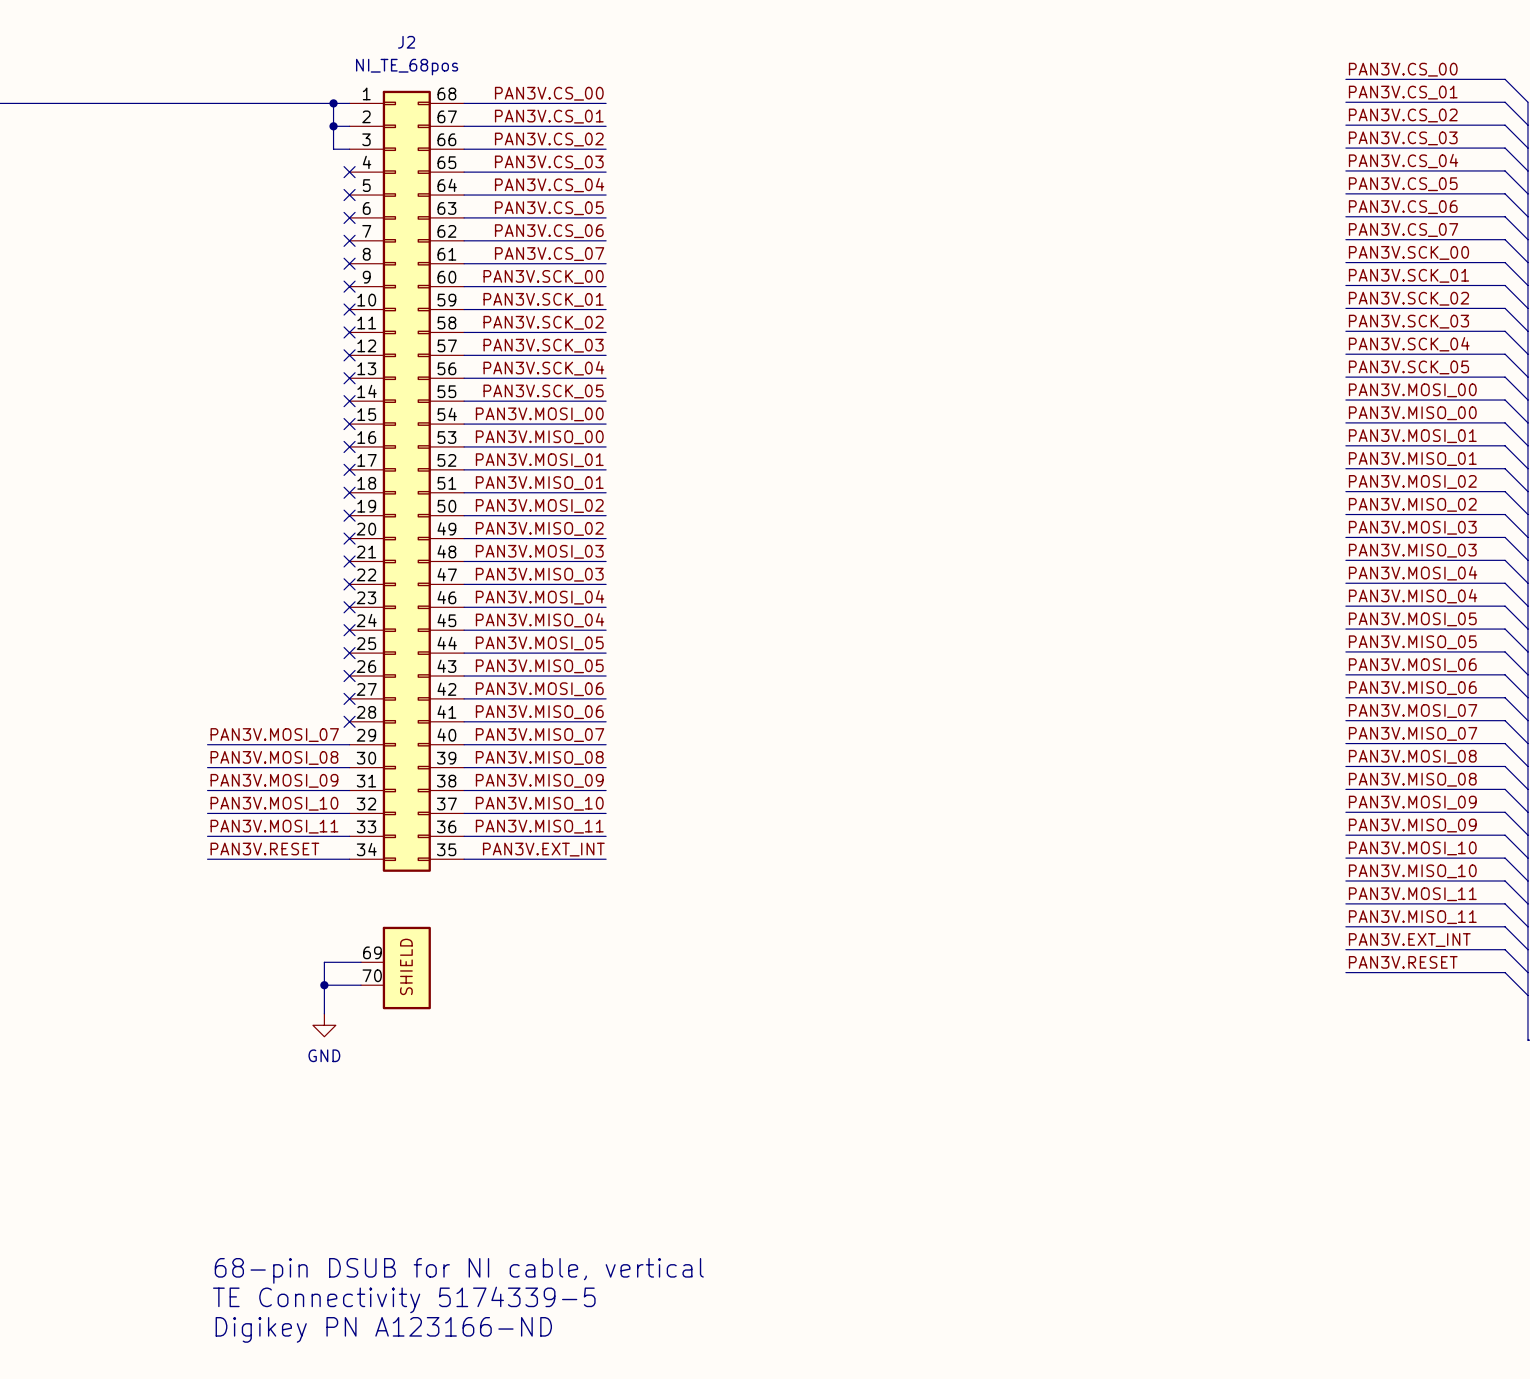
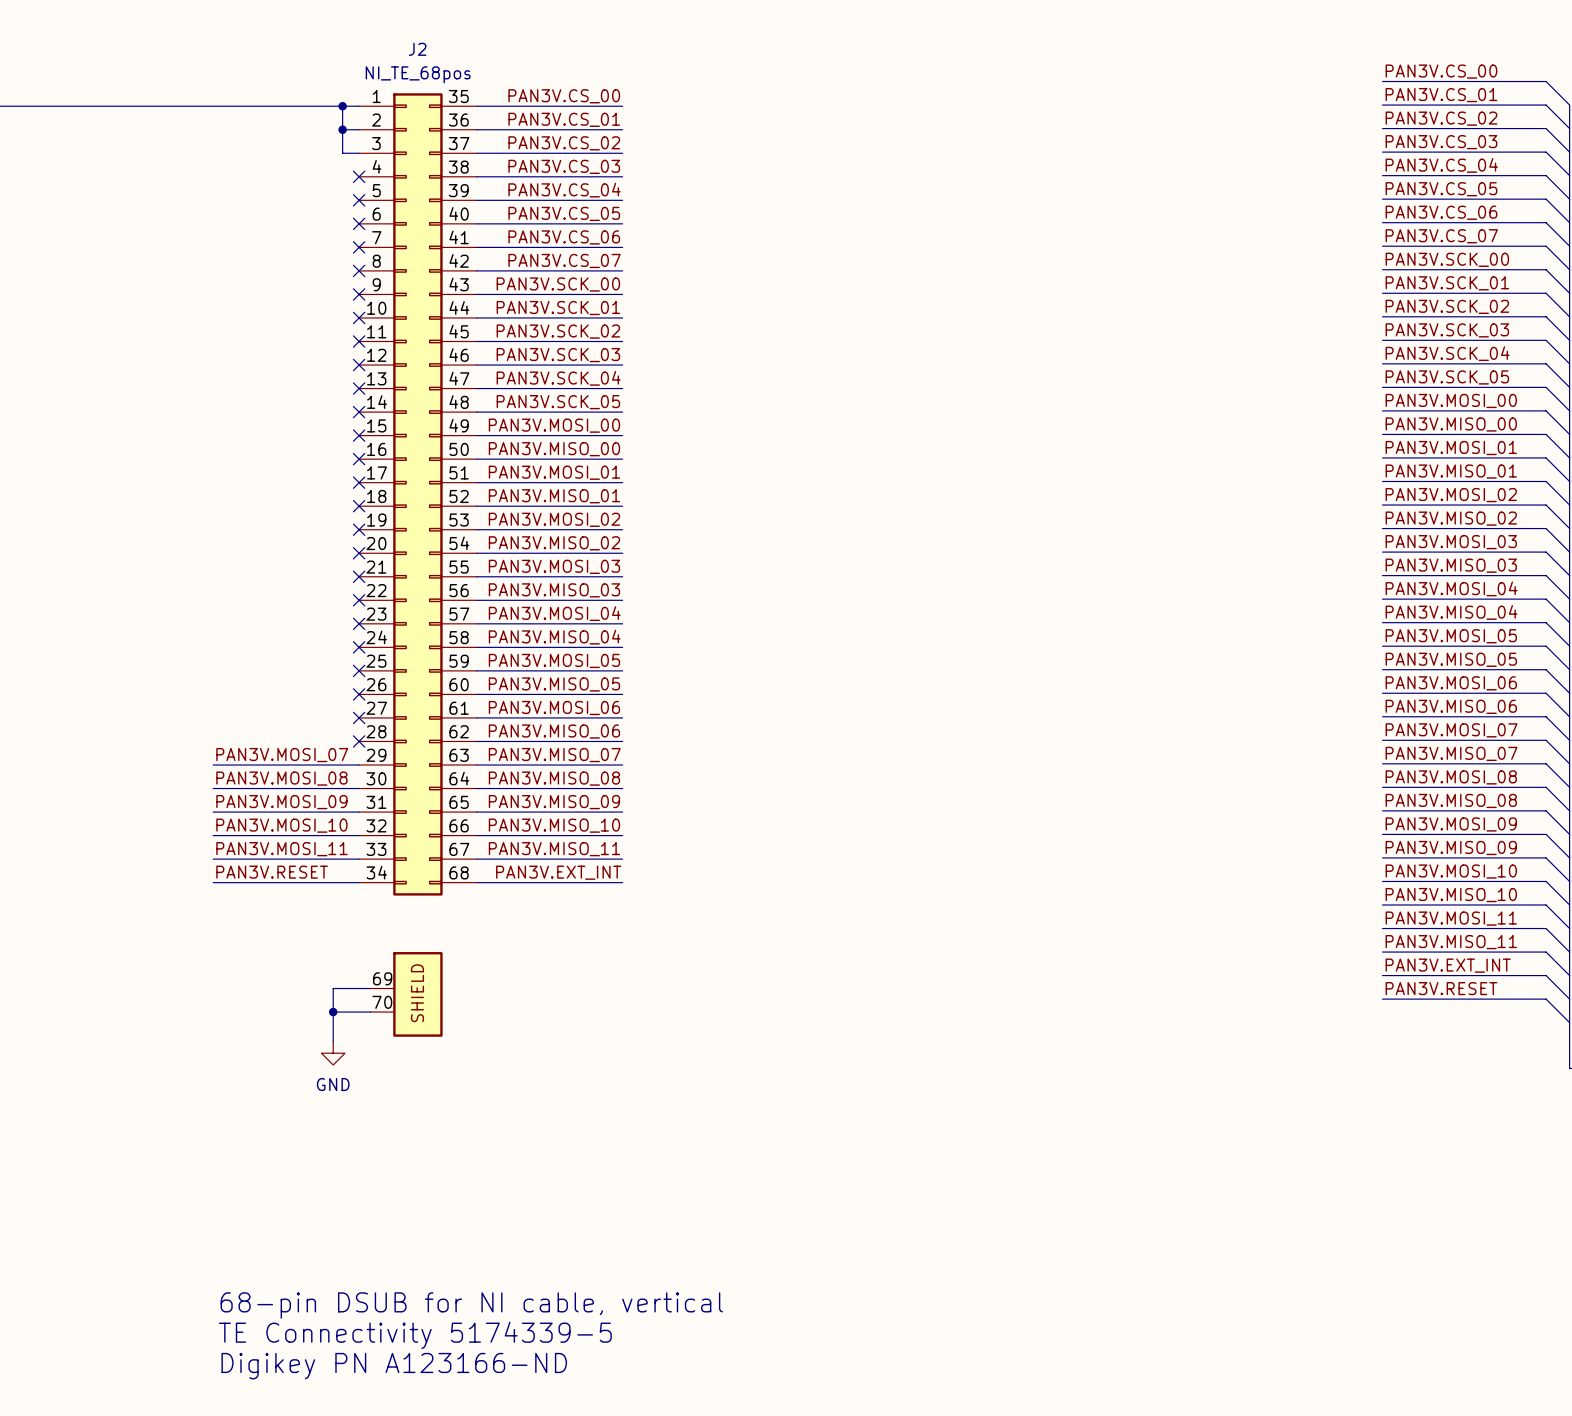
J2 symbol: [349, 90, 465, 1010] -> [359, 93, 477, 1037]

